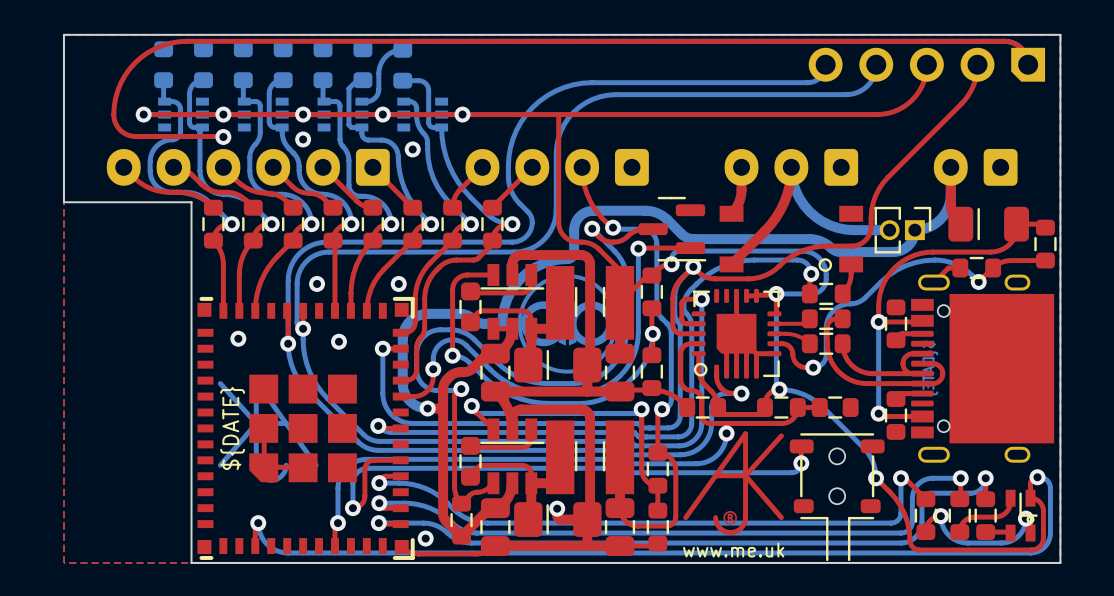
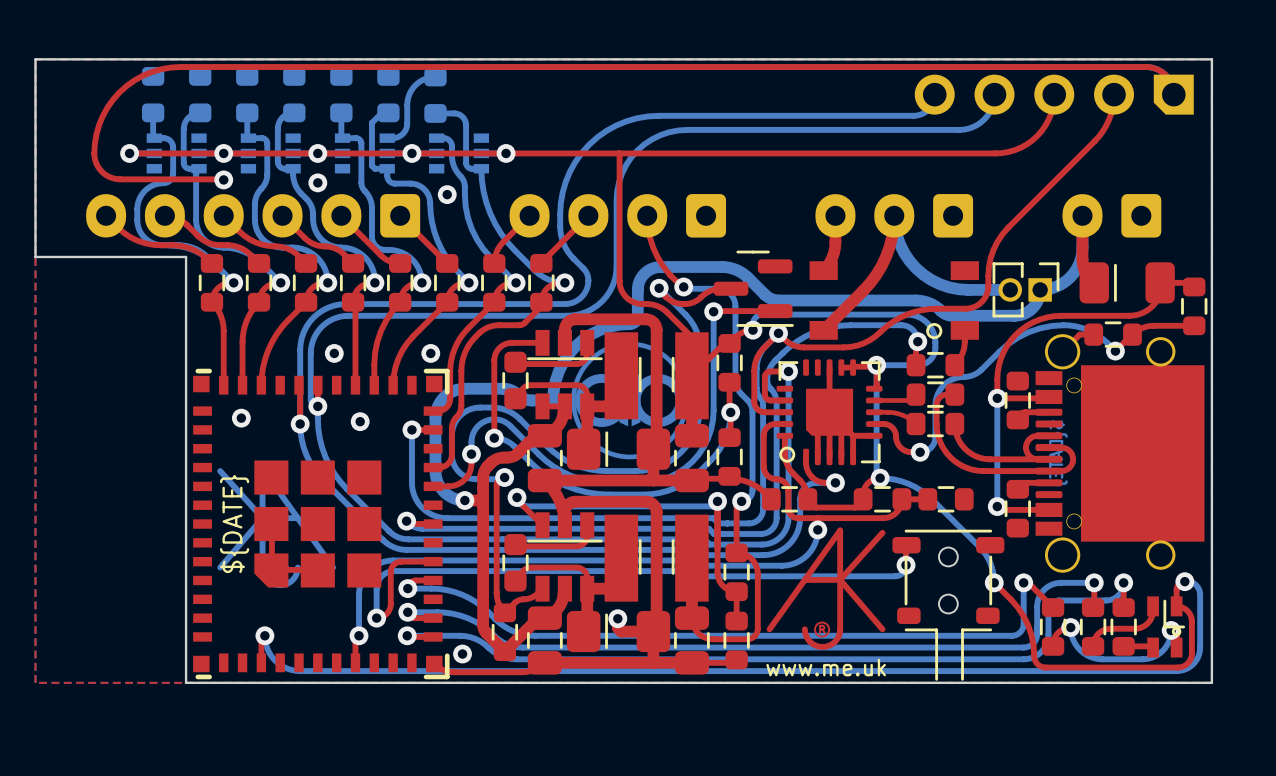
part footprint: [911, 274, 1055, 463] -> [1035, 334, 1205, 573]

